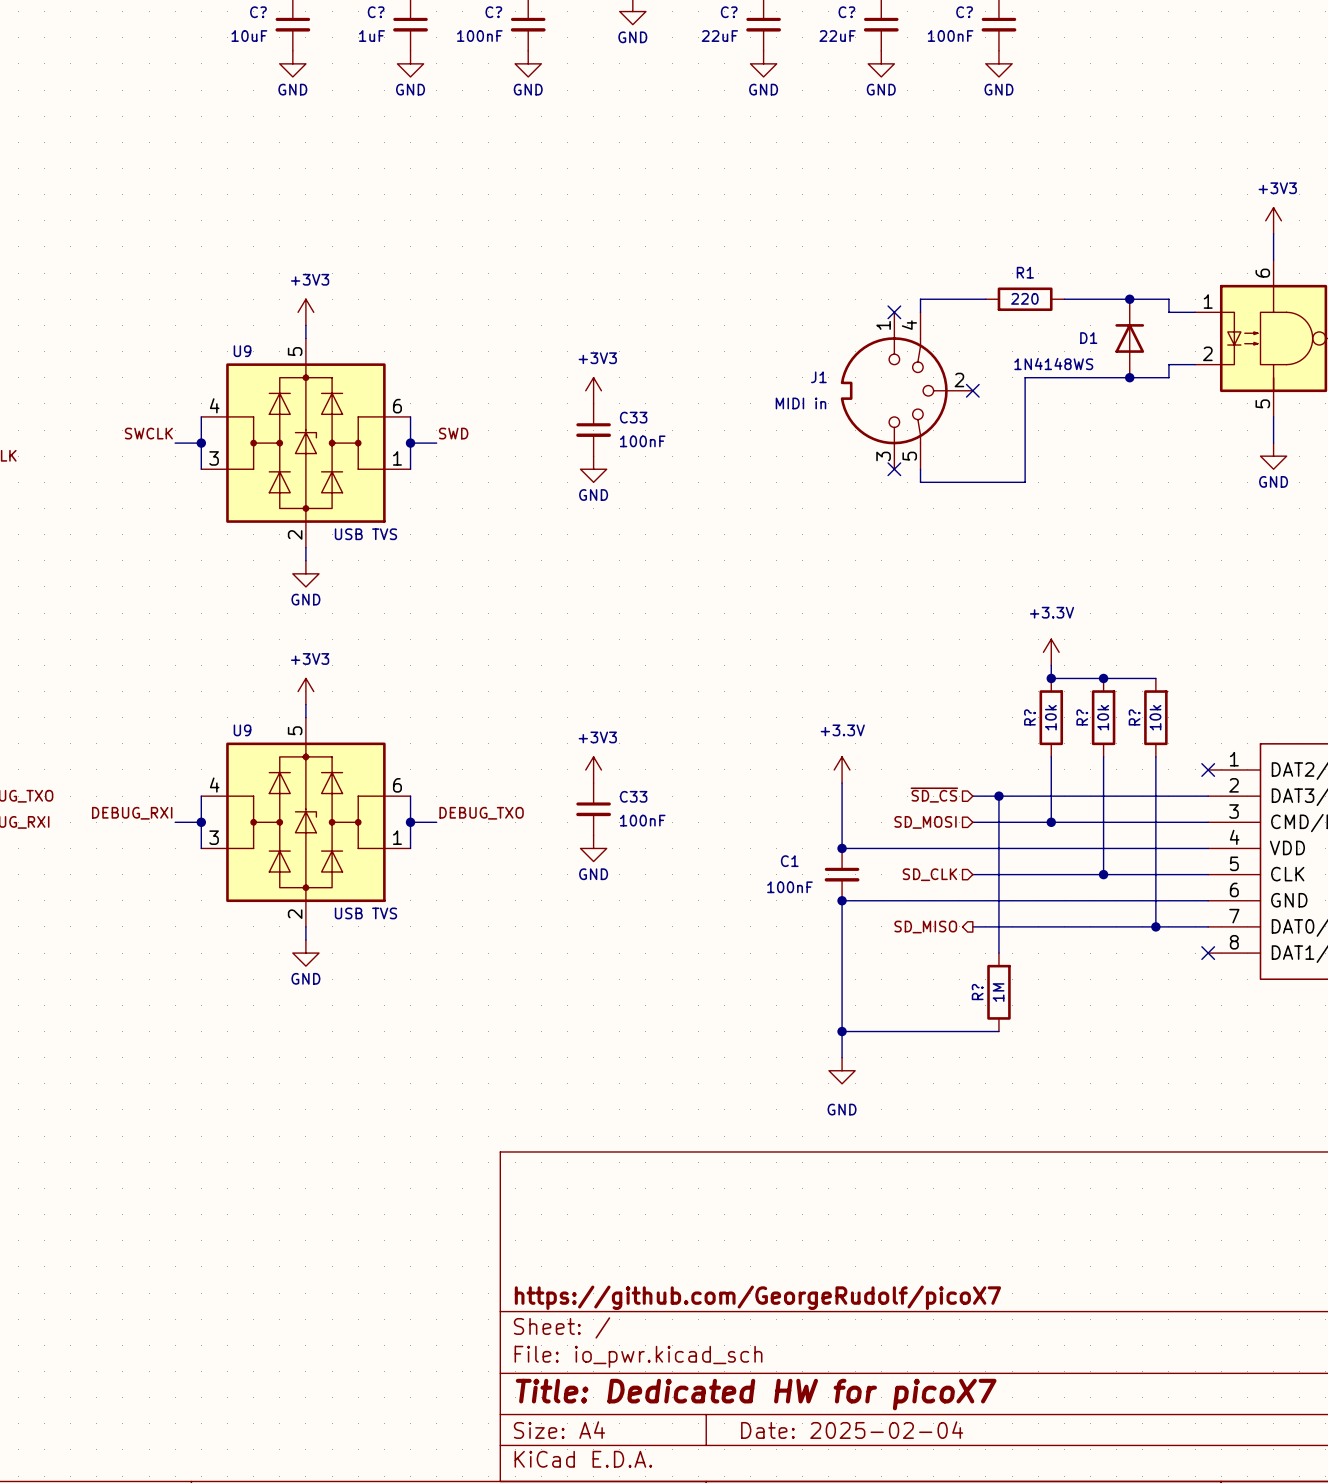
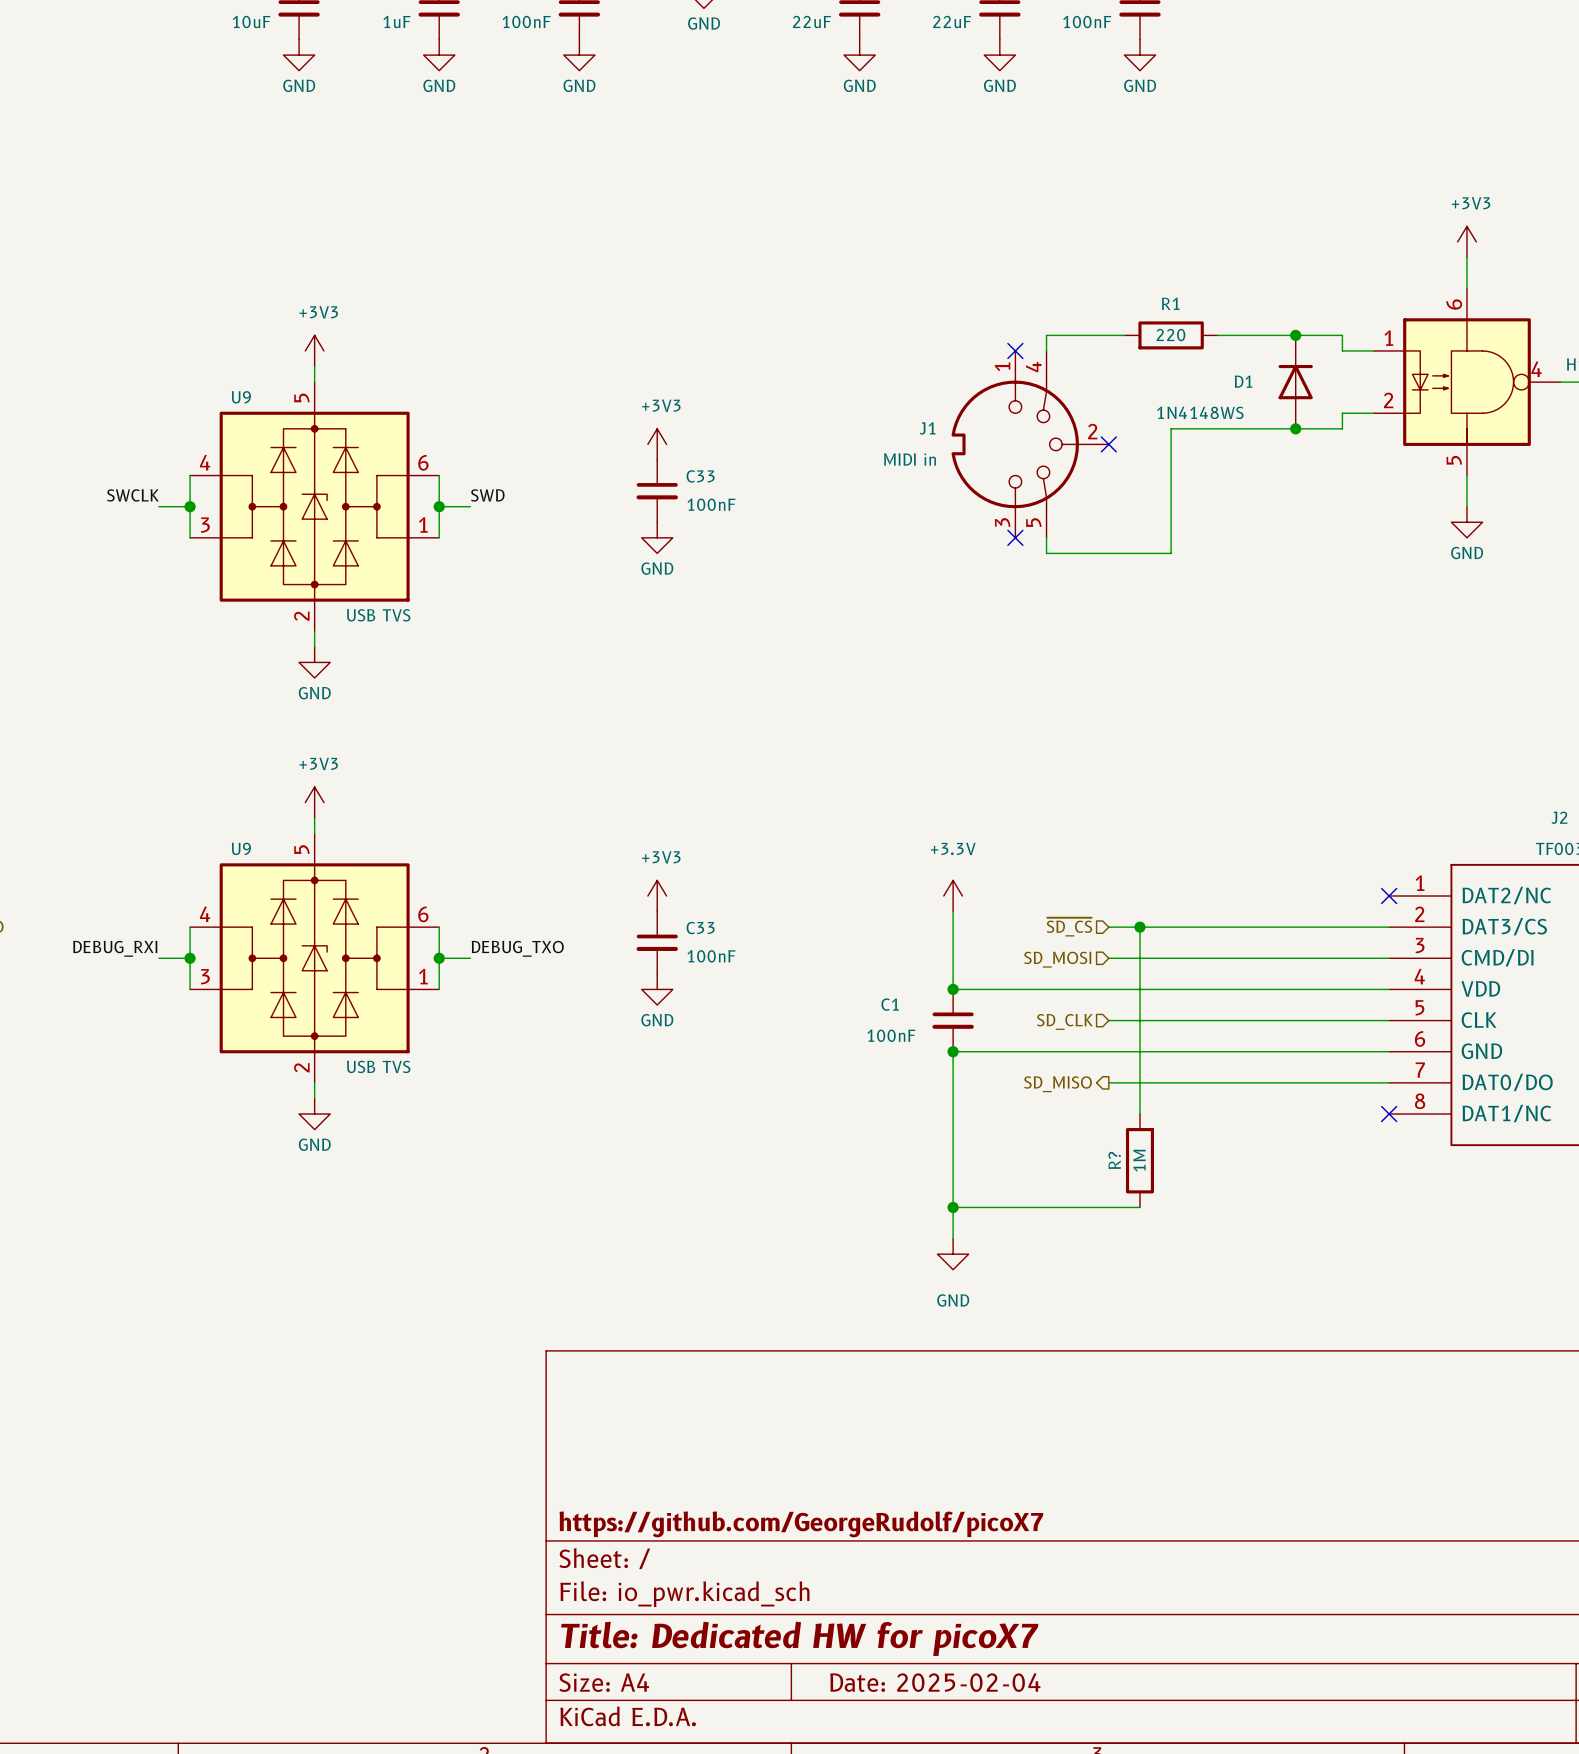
power symbol: +3.3V (1051, 652) -> none
wire: (1051, 665) (1051, 678) (1155, 678) -> none
junction: (1051, 678) -> none
junction: (1103, 678) -> none
R?: 10k (1051, 717) -> none
R?: 10k (1103, 717) -> none
R?: 10k (1155, 717) -> none
wire: (1051, 756) (1051, 822) -> none
wire: (1103, 756) (1103, 874) -> none
wire: (1155, 756) (1155, 926) -> none
junction: (1051, 822) -> none
junction: (1103, 874) -> none
junction: (1155, 926) -> none

